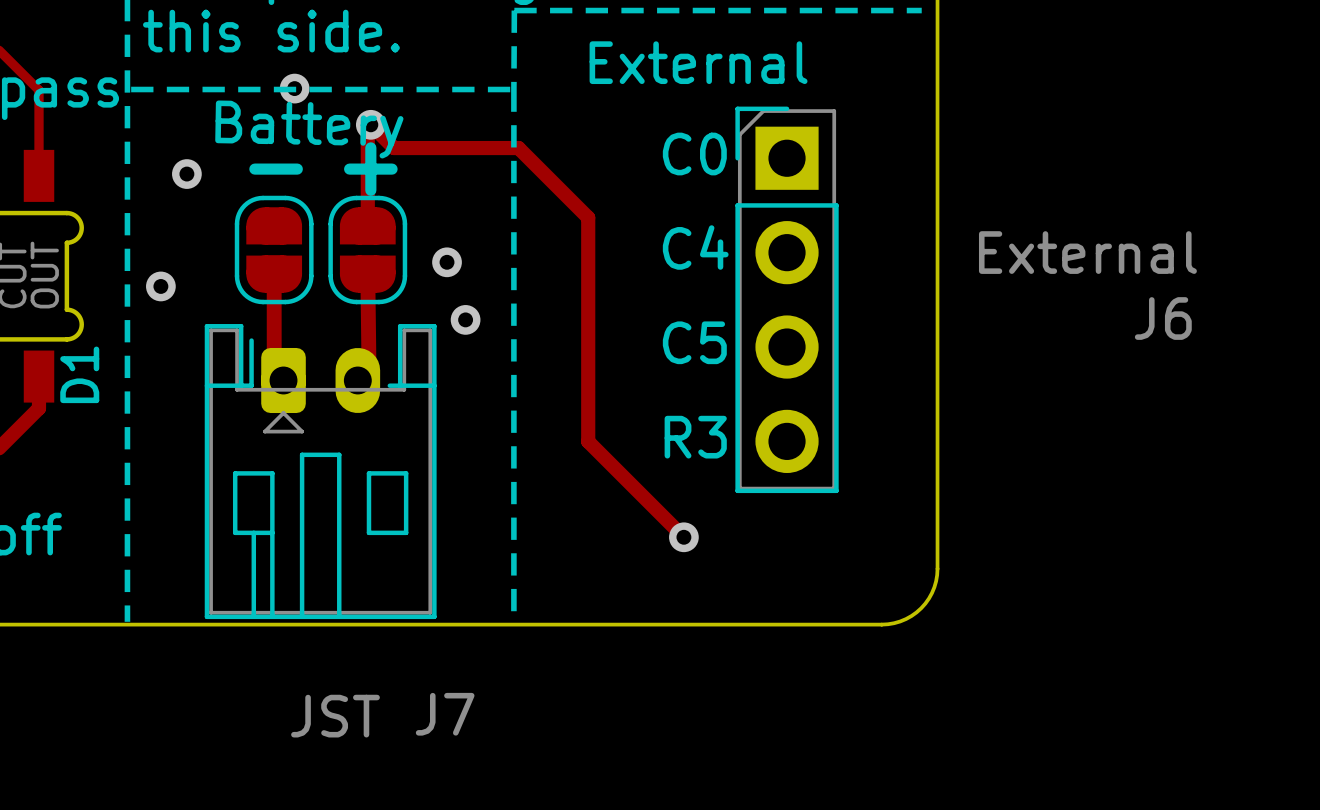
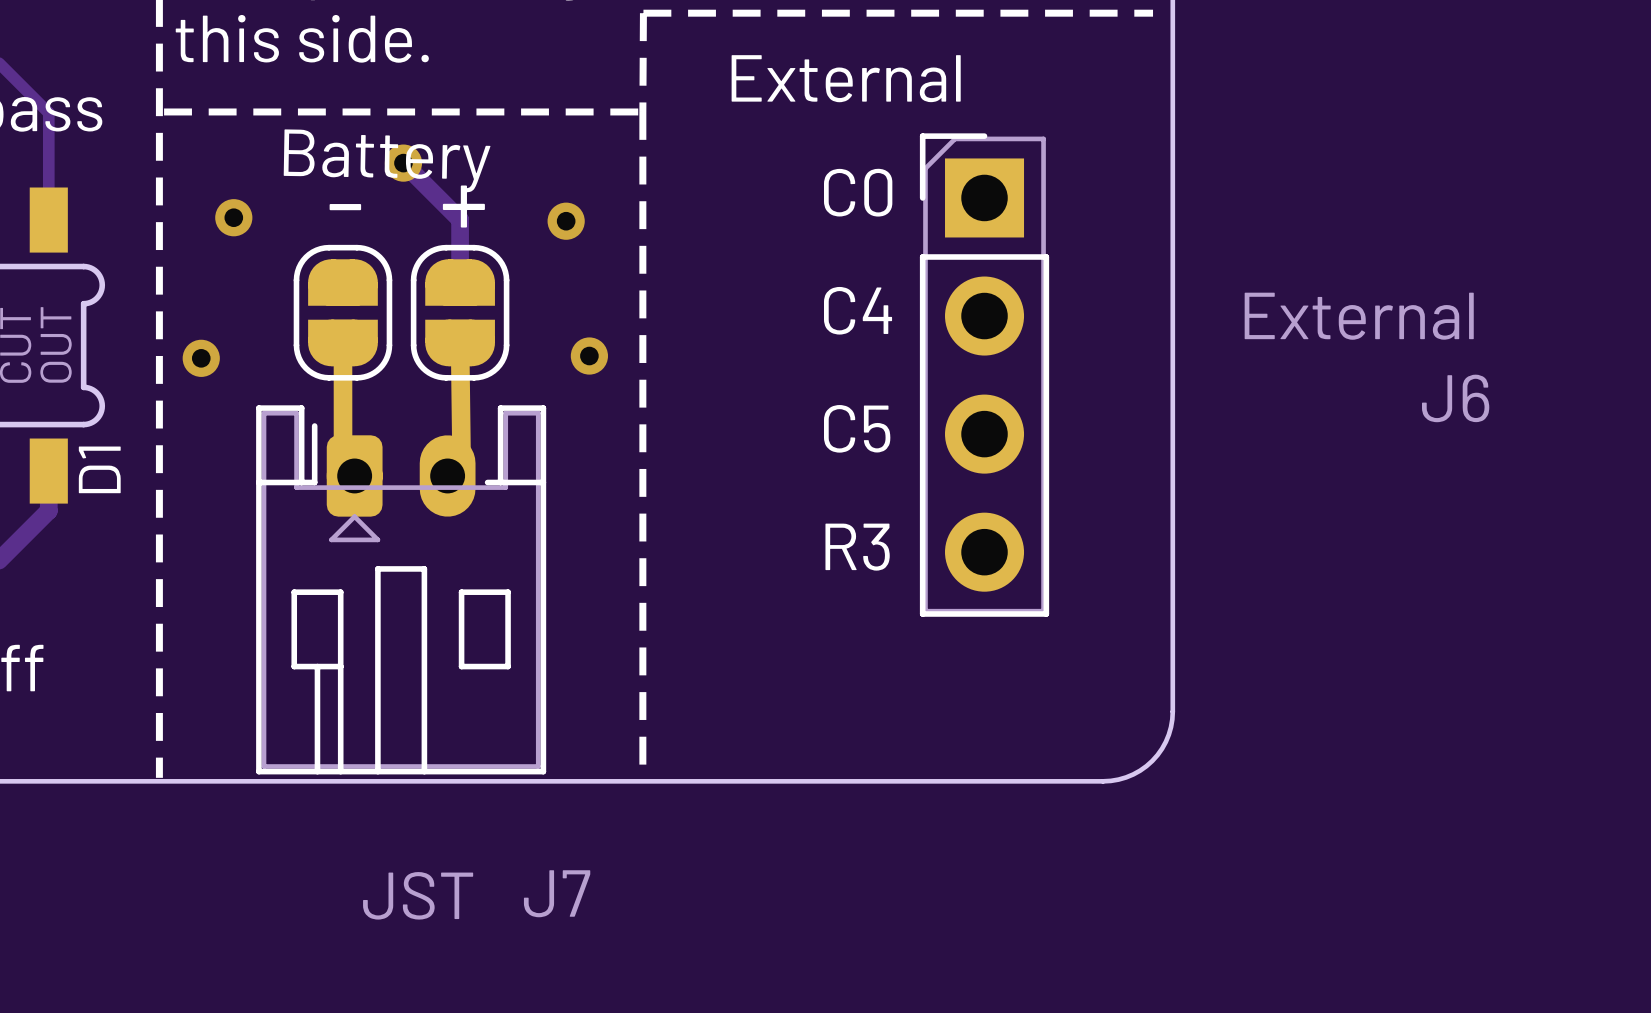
via: (294, 88) -> none
via: (370, 124) -> none
via: none -> (403, 163)
track: (367, 175) (367, 127) (370, 124) (394, 148) (518, 148) (588, 217) (588, 441) (683, 537) -> (460, 219) (403, 163)
via: none -> (566, 221)
via position: (447, 262) -> (589, 356)
via: (465, 319) -> none
via: (683, 537) -> none

